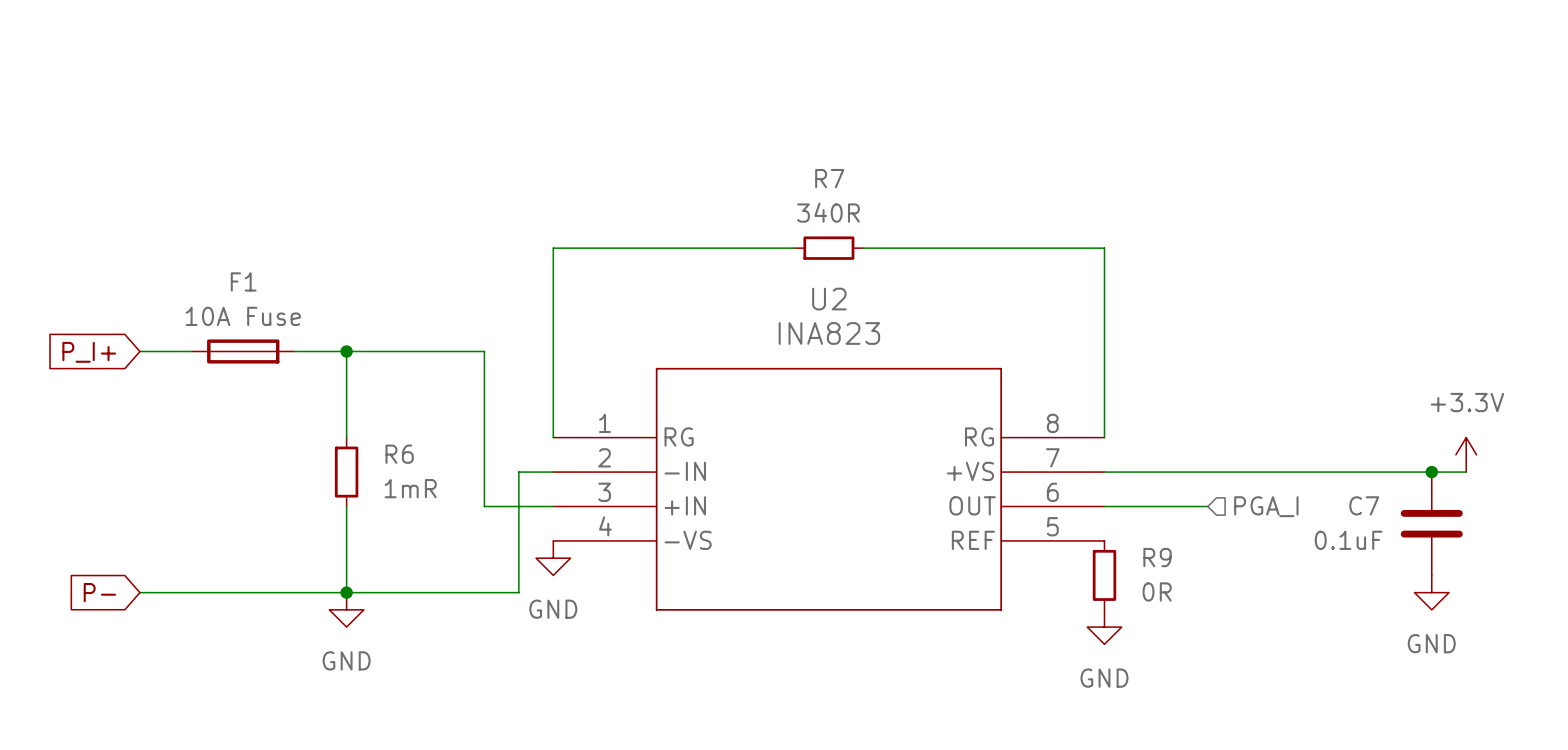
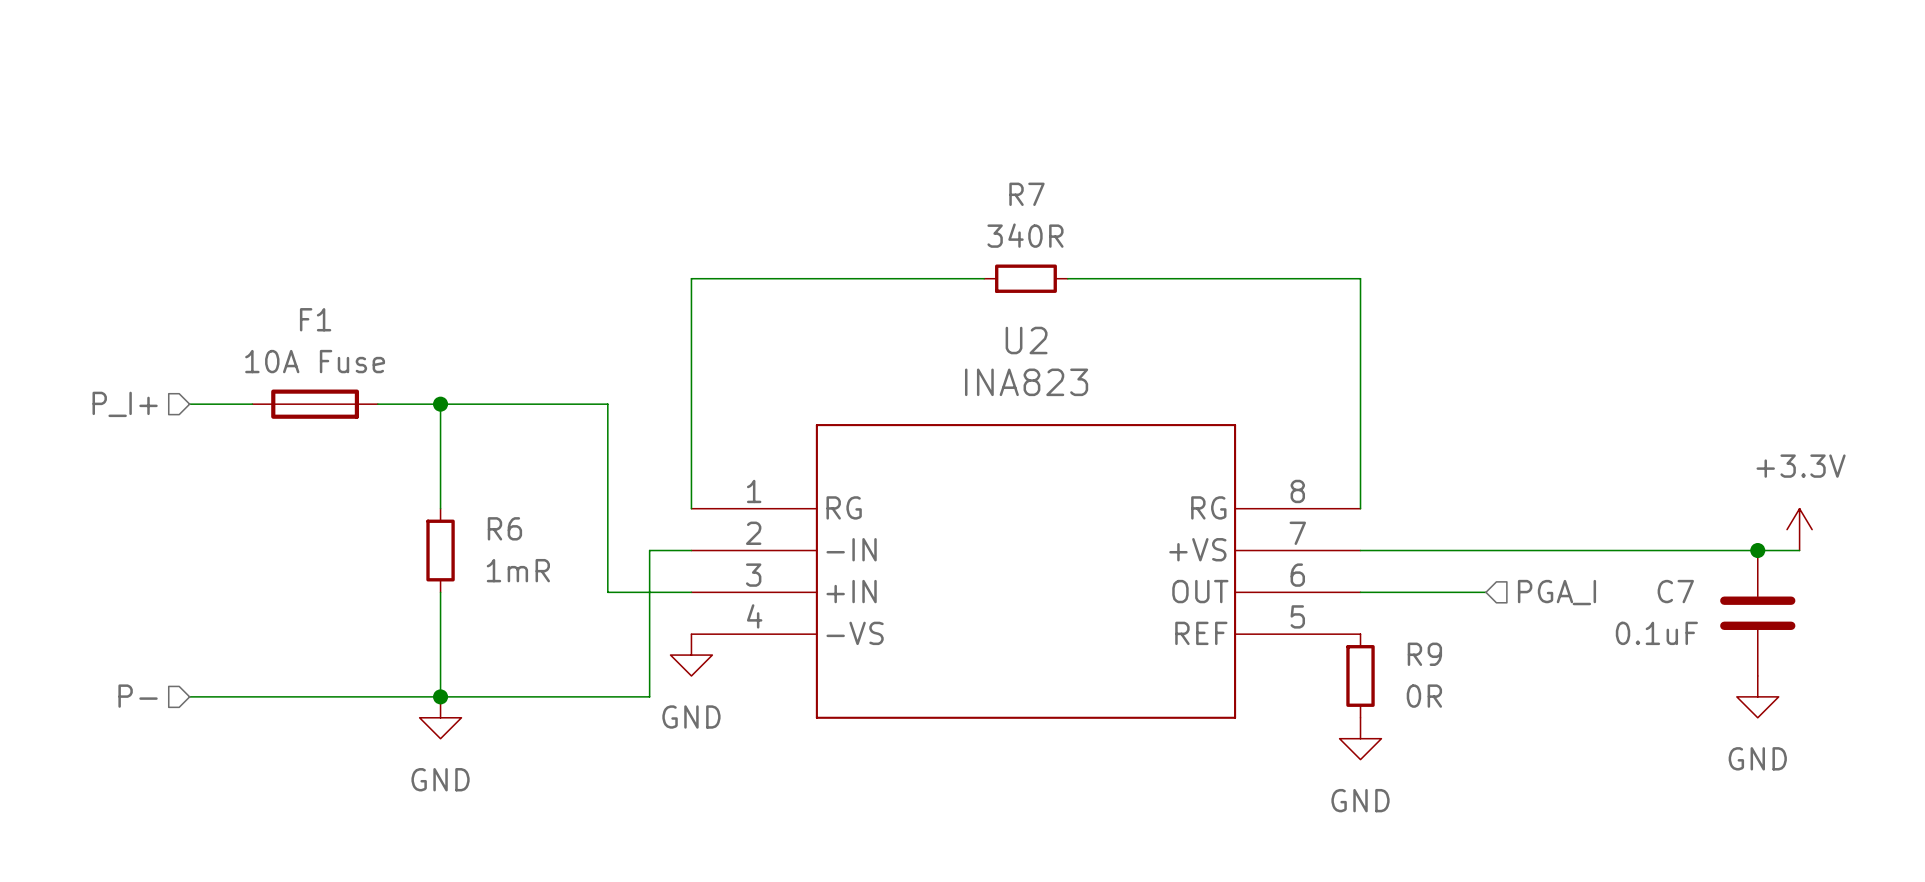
hierarchical label: none -> P_I+ (125, 404)
global label: P_I+ (89, 352) -> none
hierarchical label: none -> P- (138, 696)
global label: P- (99, 592) -> none

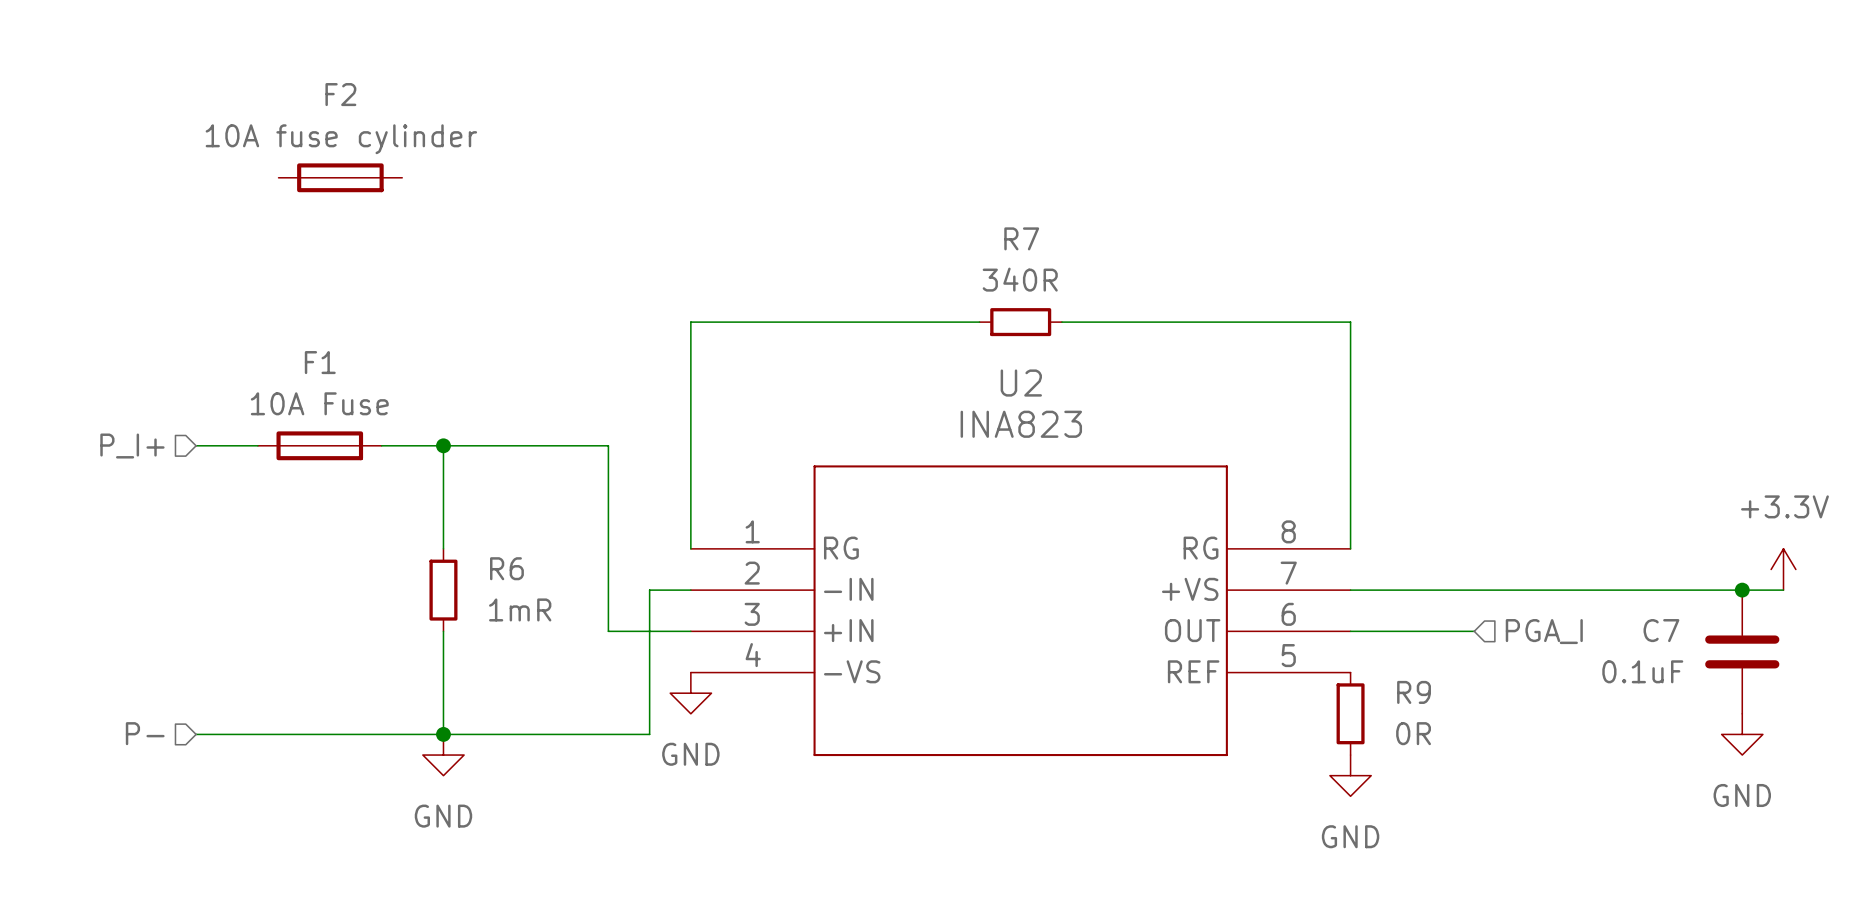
F2: none -> 10A fuse cylinder (340, 177)

